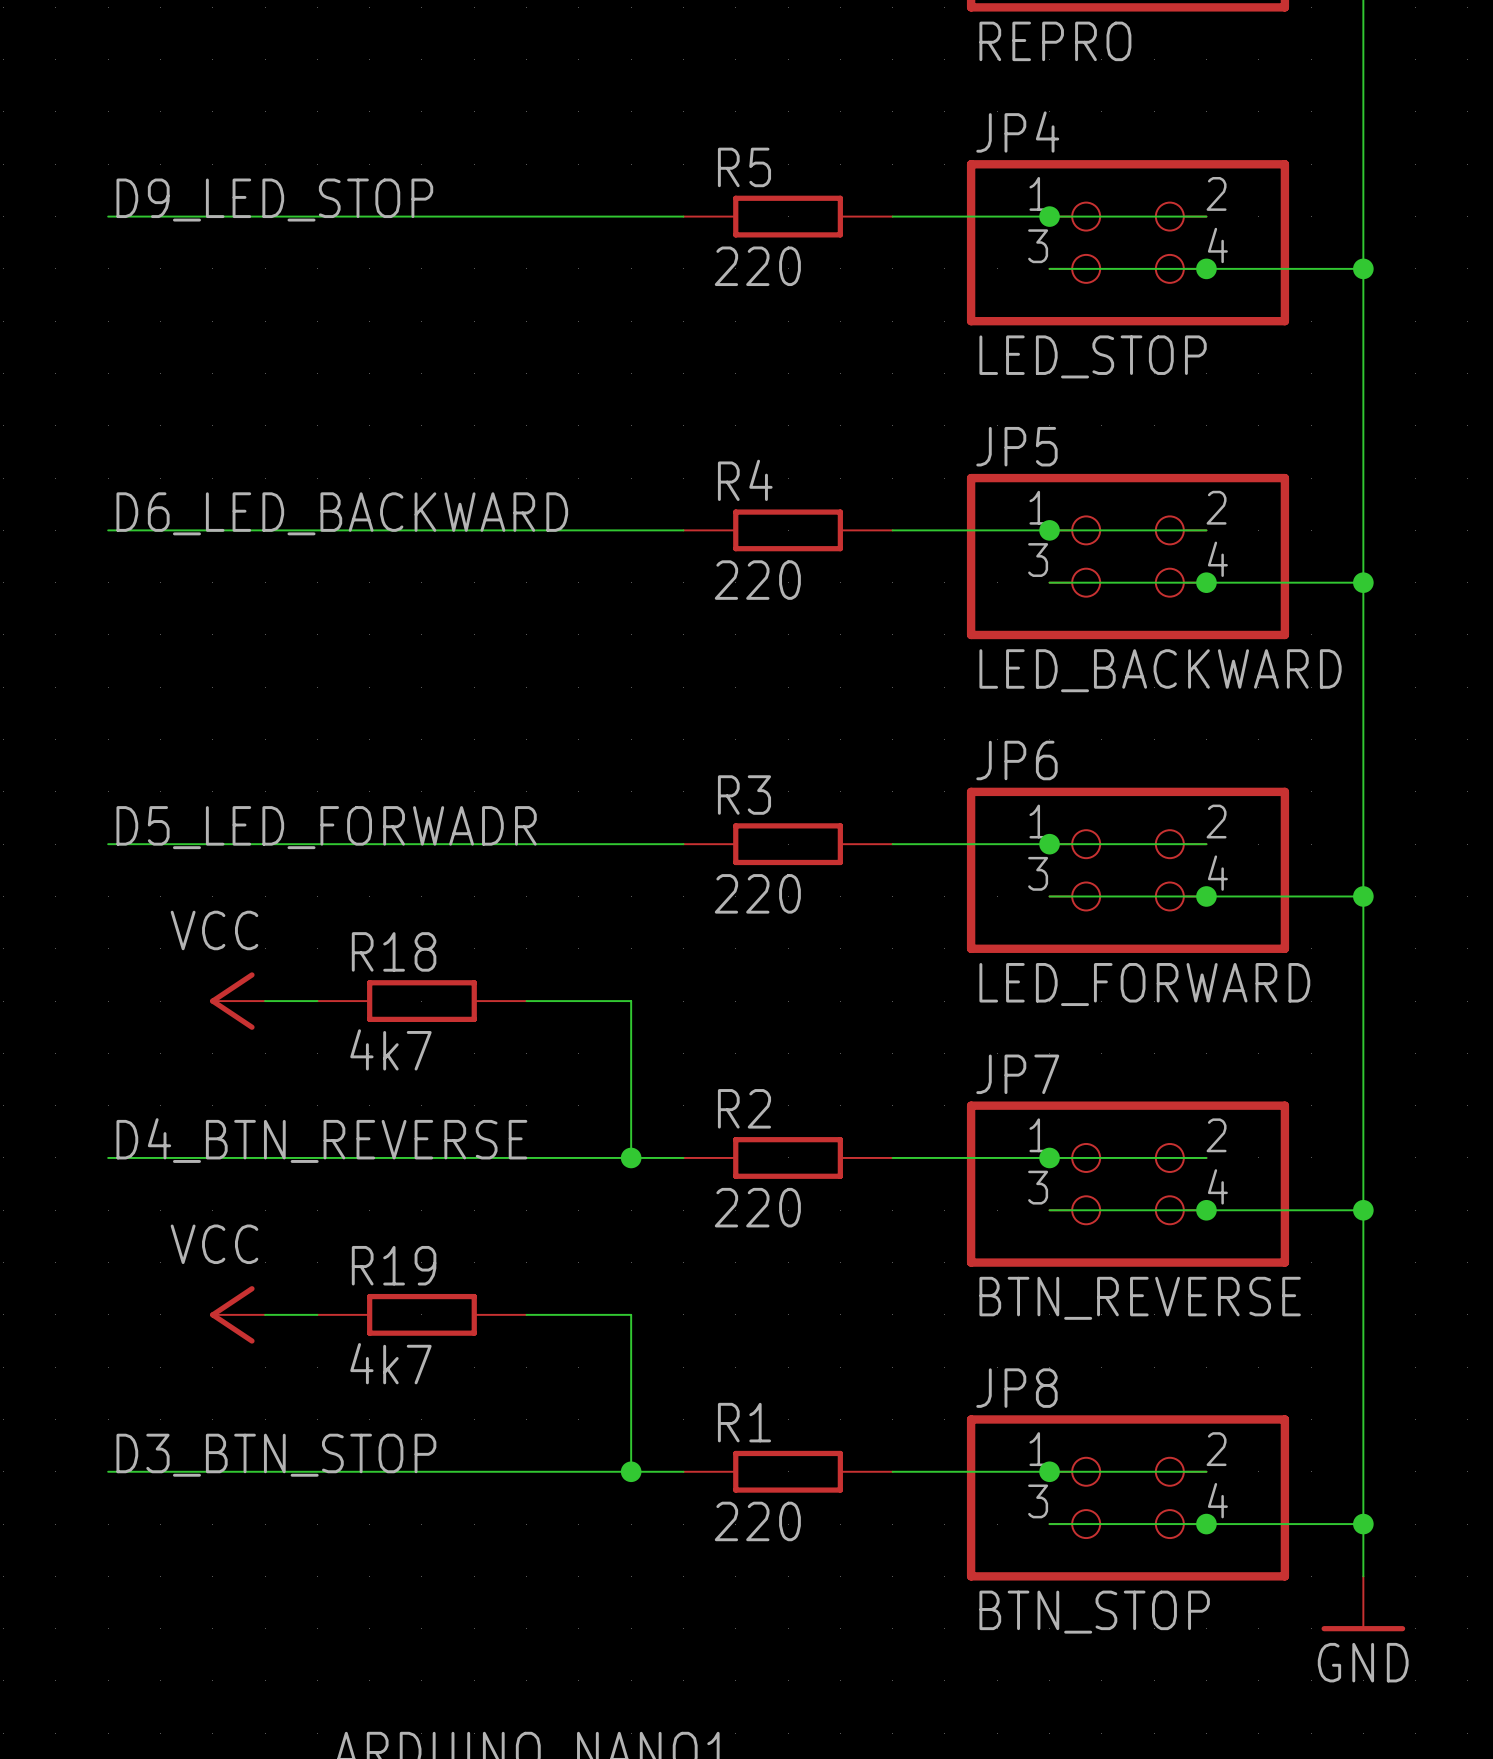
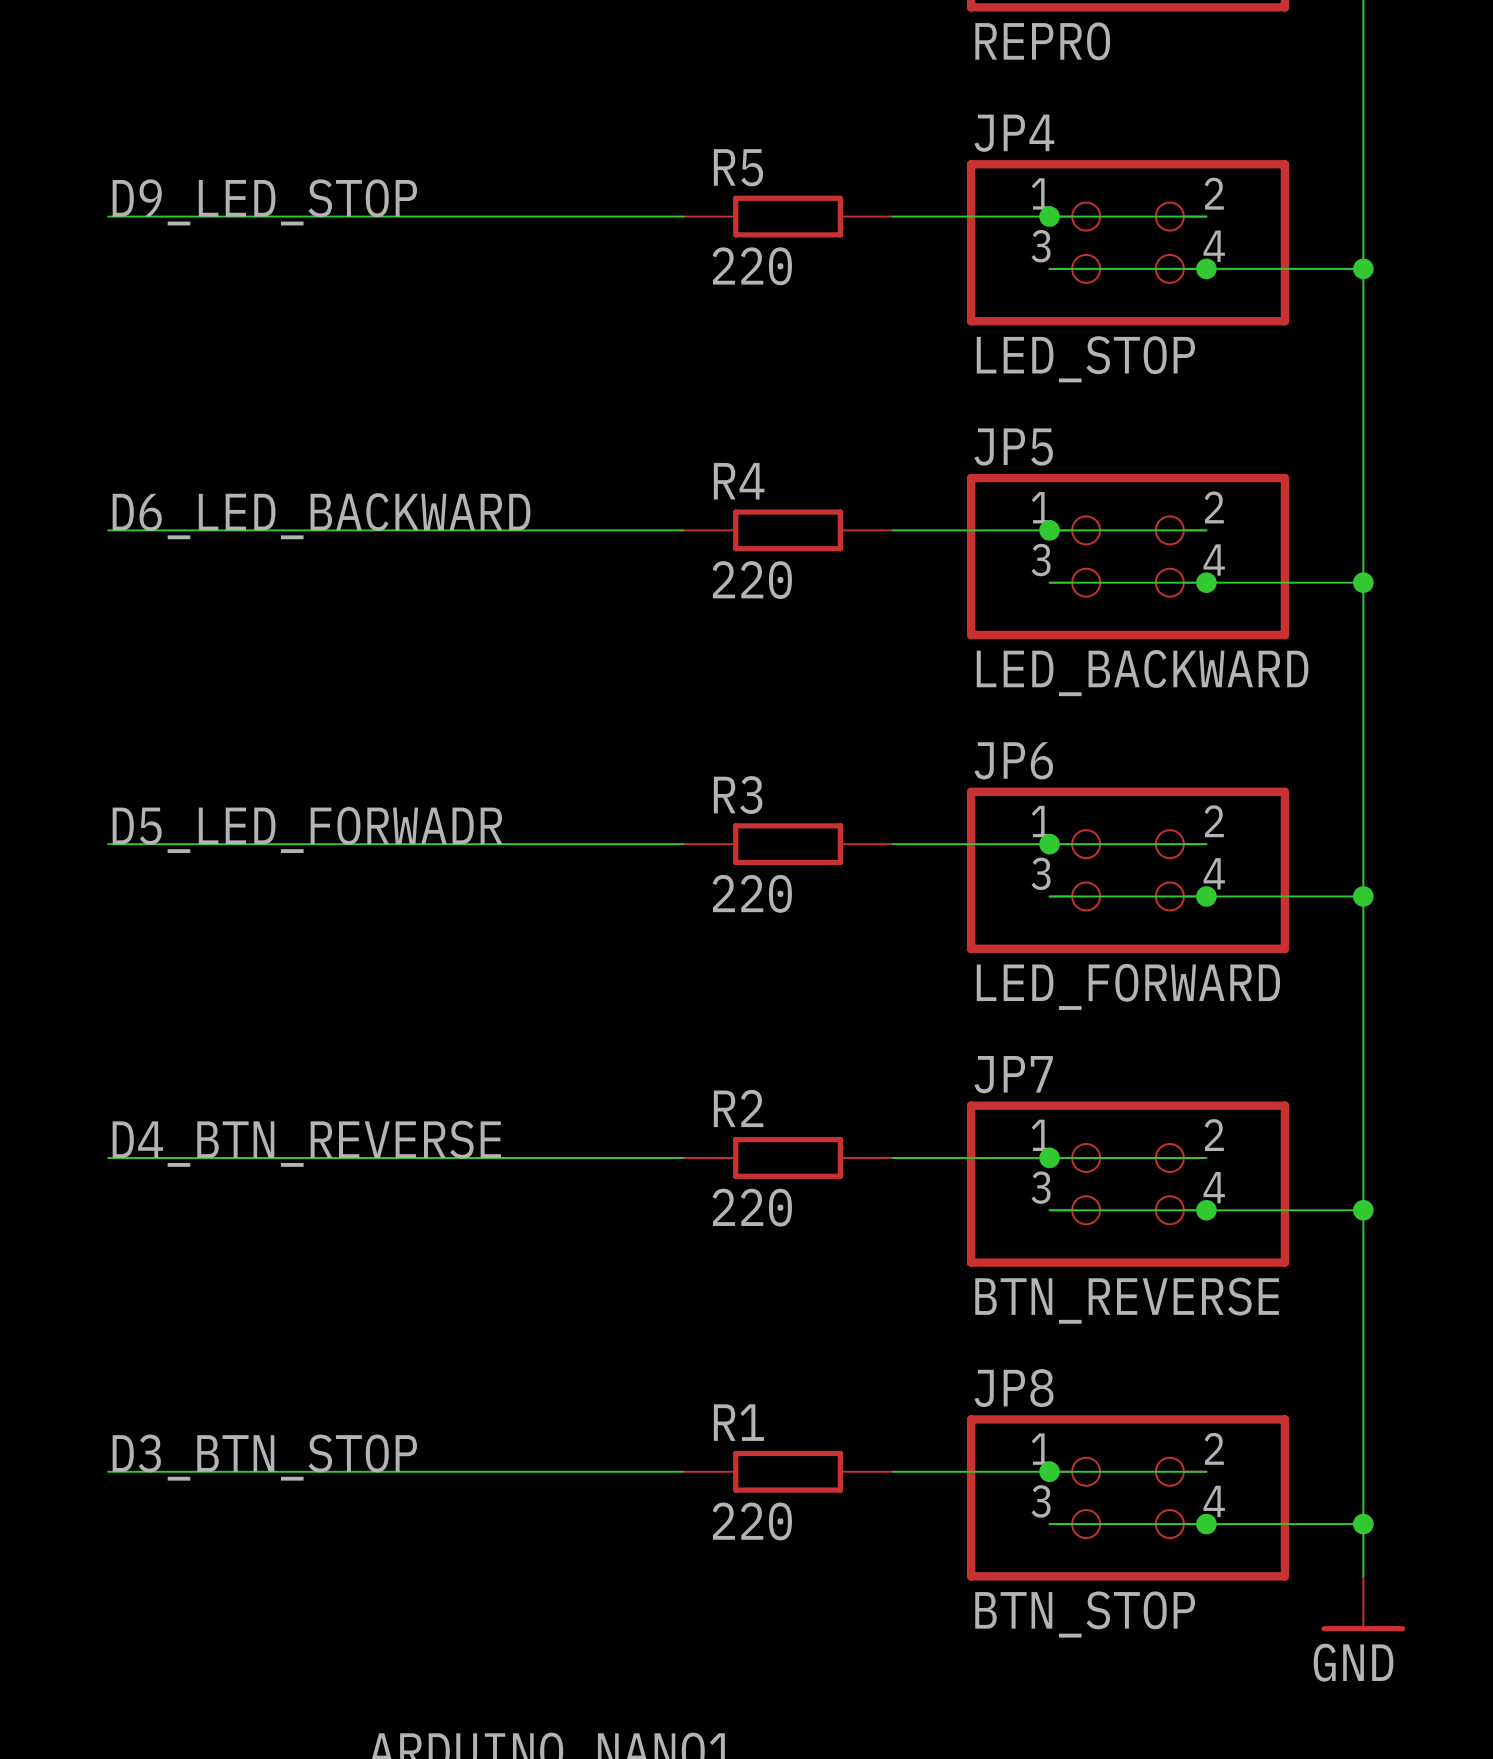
power symbol: VCC (237, 1001) -> none
wire: (265, 1001) (317, 1001) -> none
R18: 4k7 (421, 1001) -> none
wire: (526, 1001) (631, 1001) (631, 1157) -> none
junction: (631, 1157) -> none
power symbol: VCC (237, 1314) -> none
wire: (265, 1314) (317, 1314) -> none
R19: 4k7 (421, 1314) -> none
wire: (526, 1314) (631, 1314) (631, 1471) -> none
junction: (631, 1471) -> none

